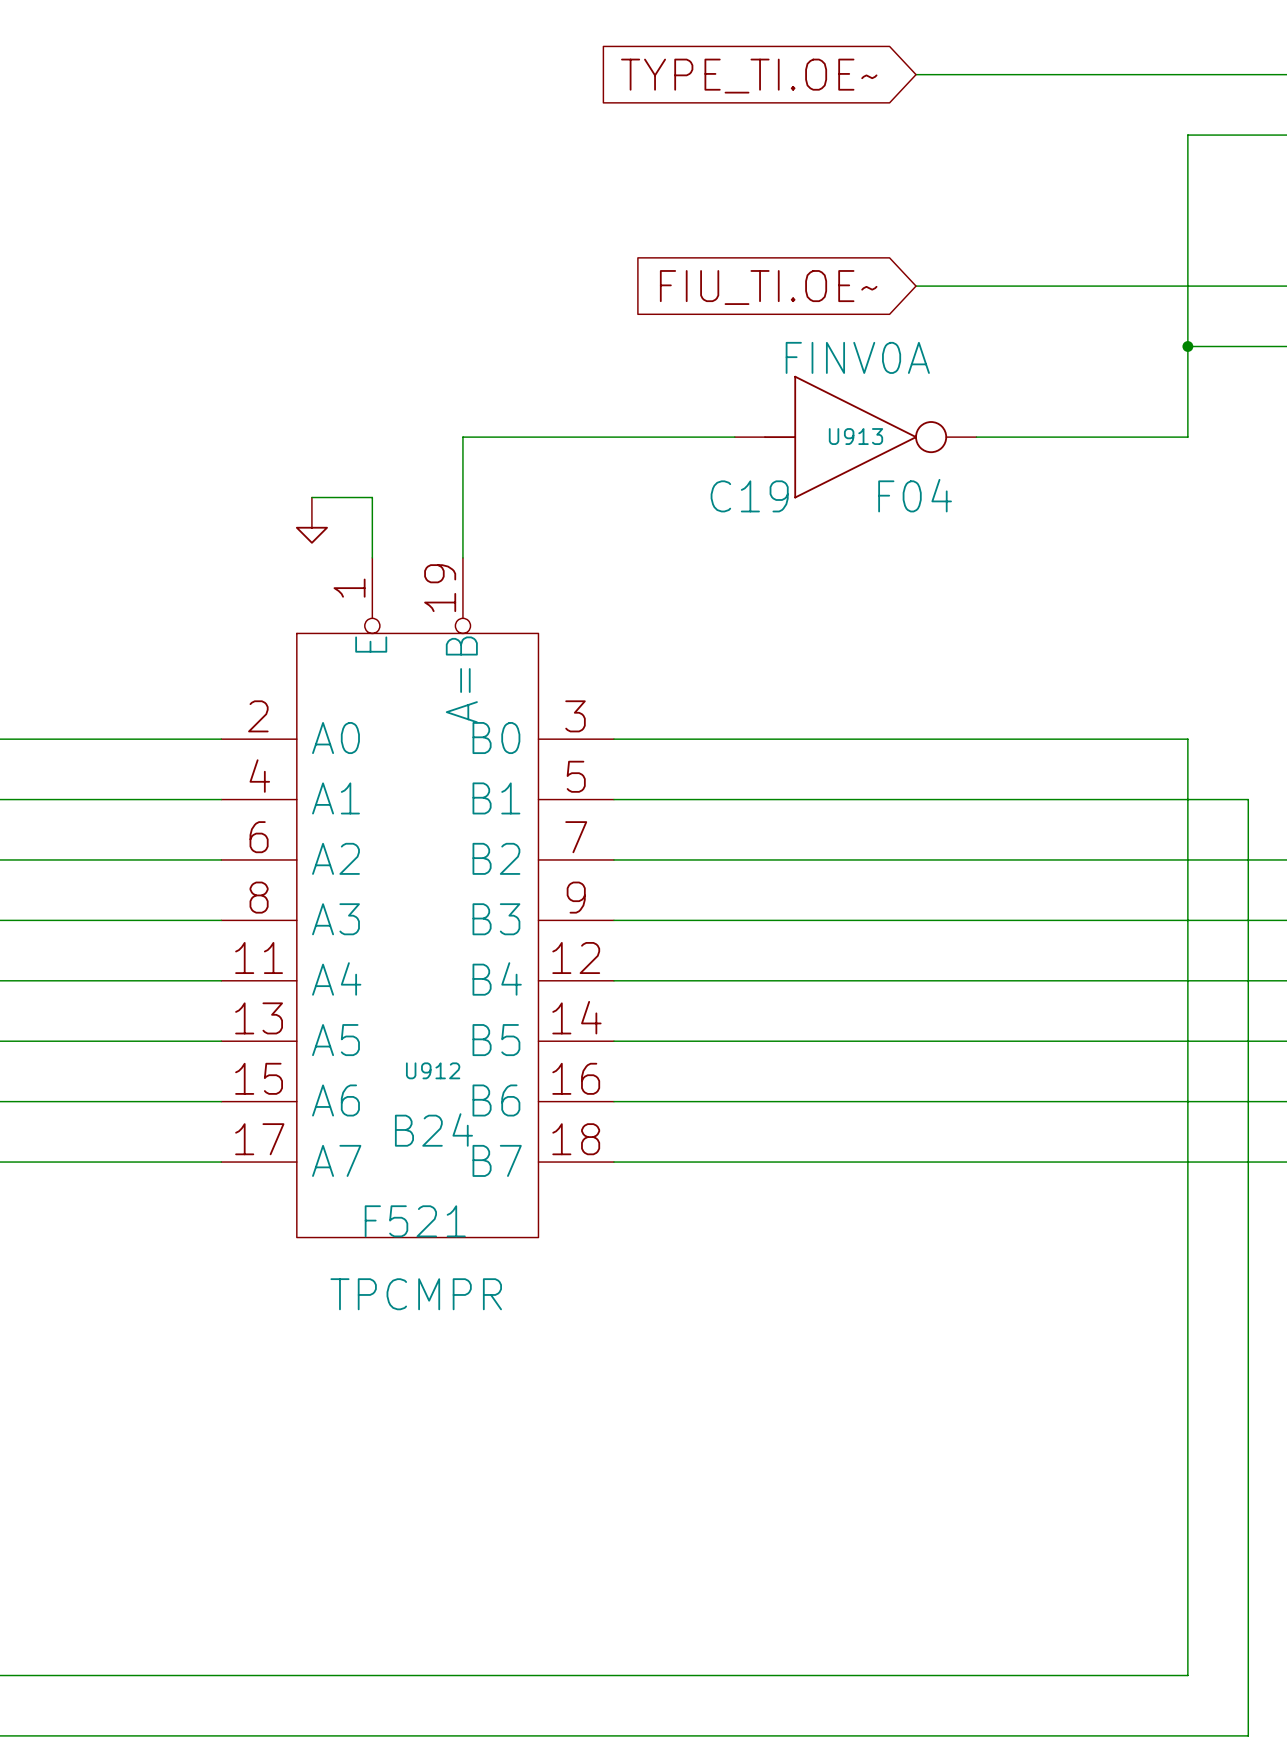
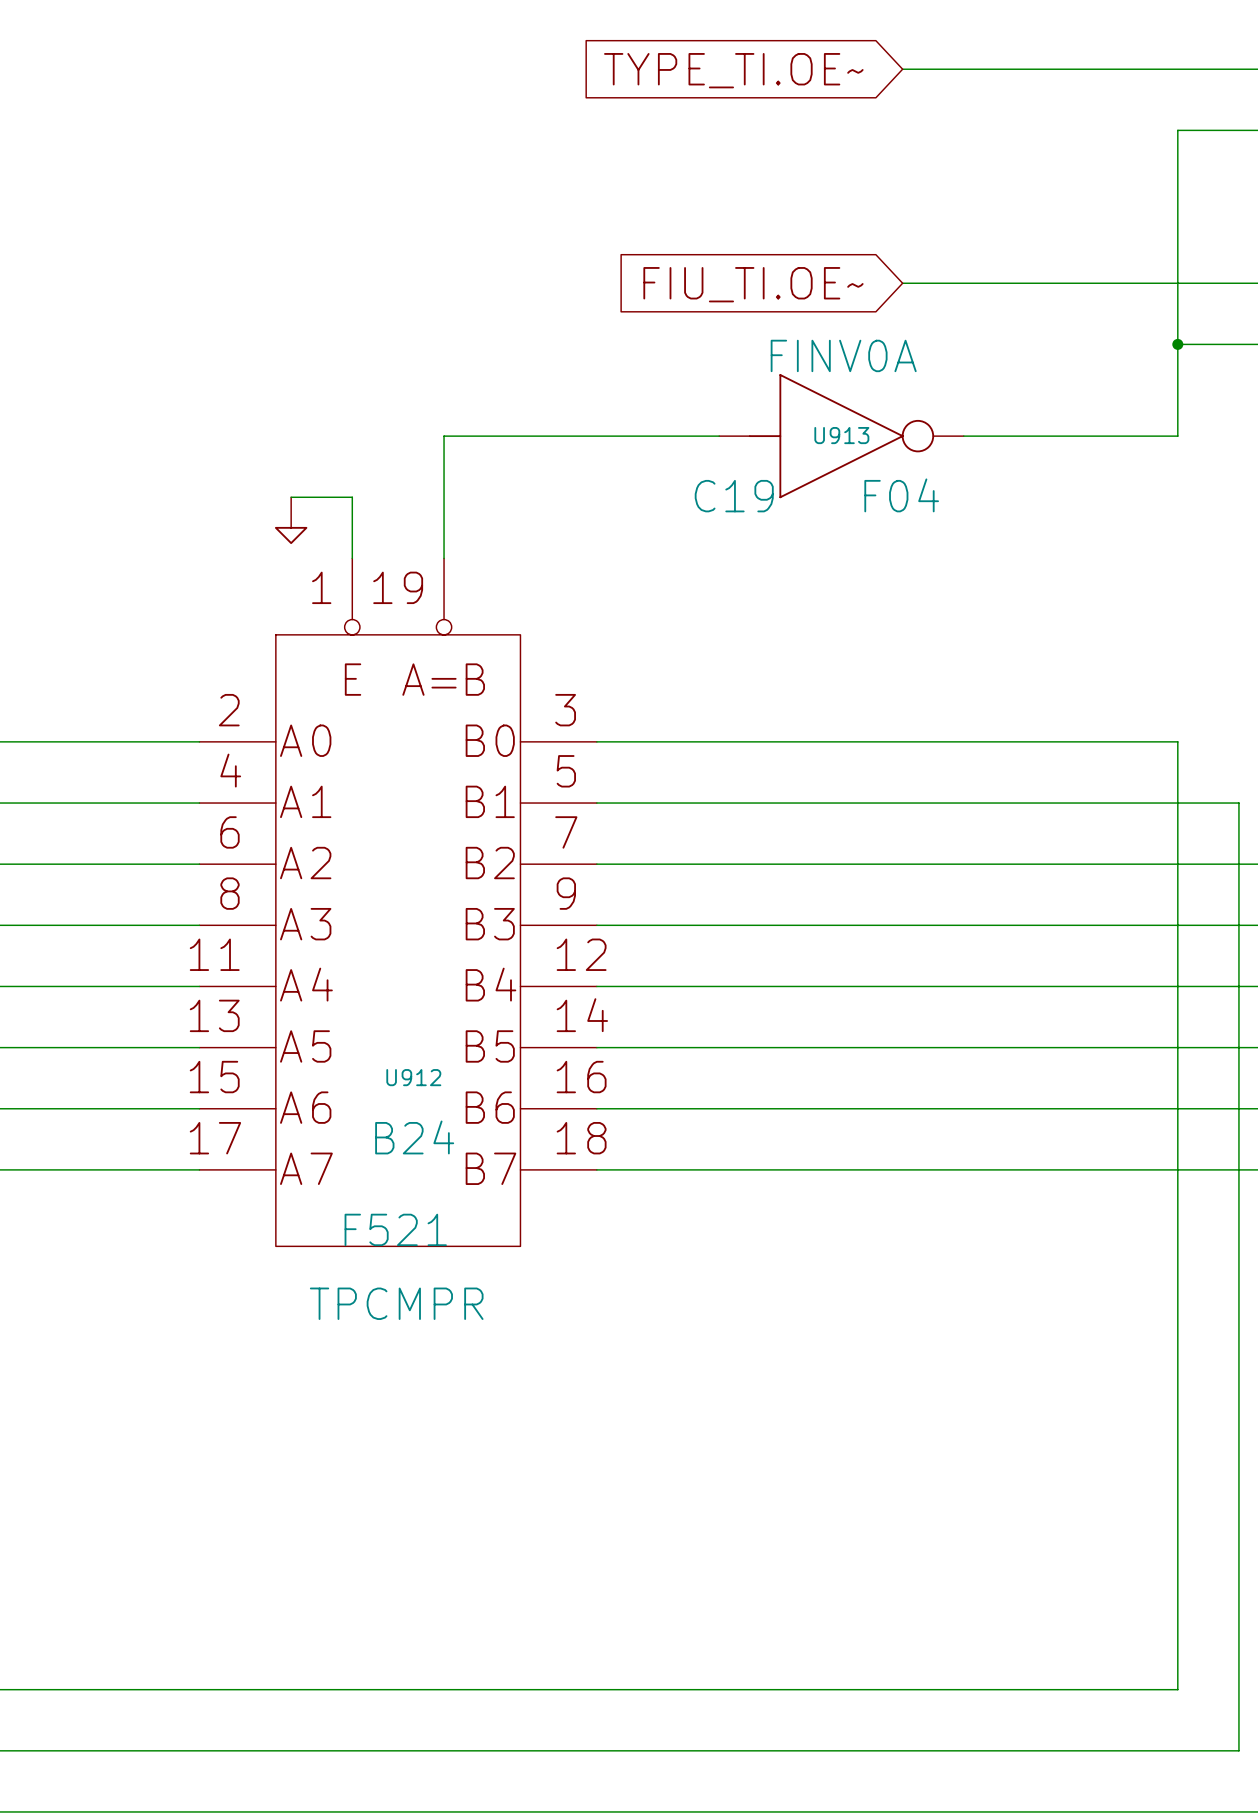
U912 symbol: [221, 557, 614, 1238] -> [199, 558, 597, 1247]

